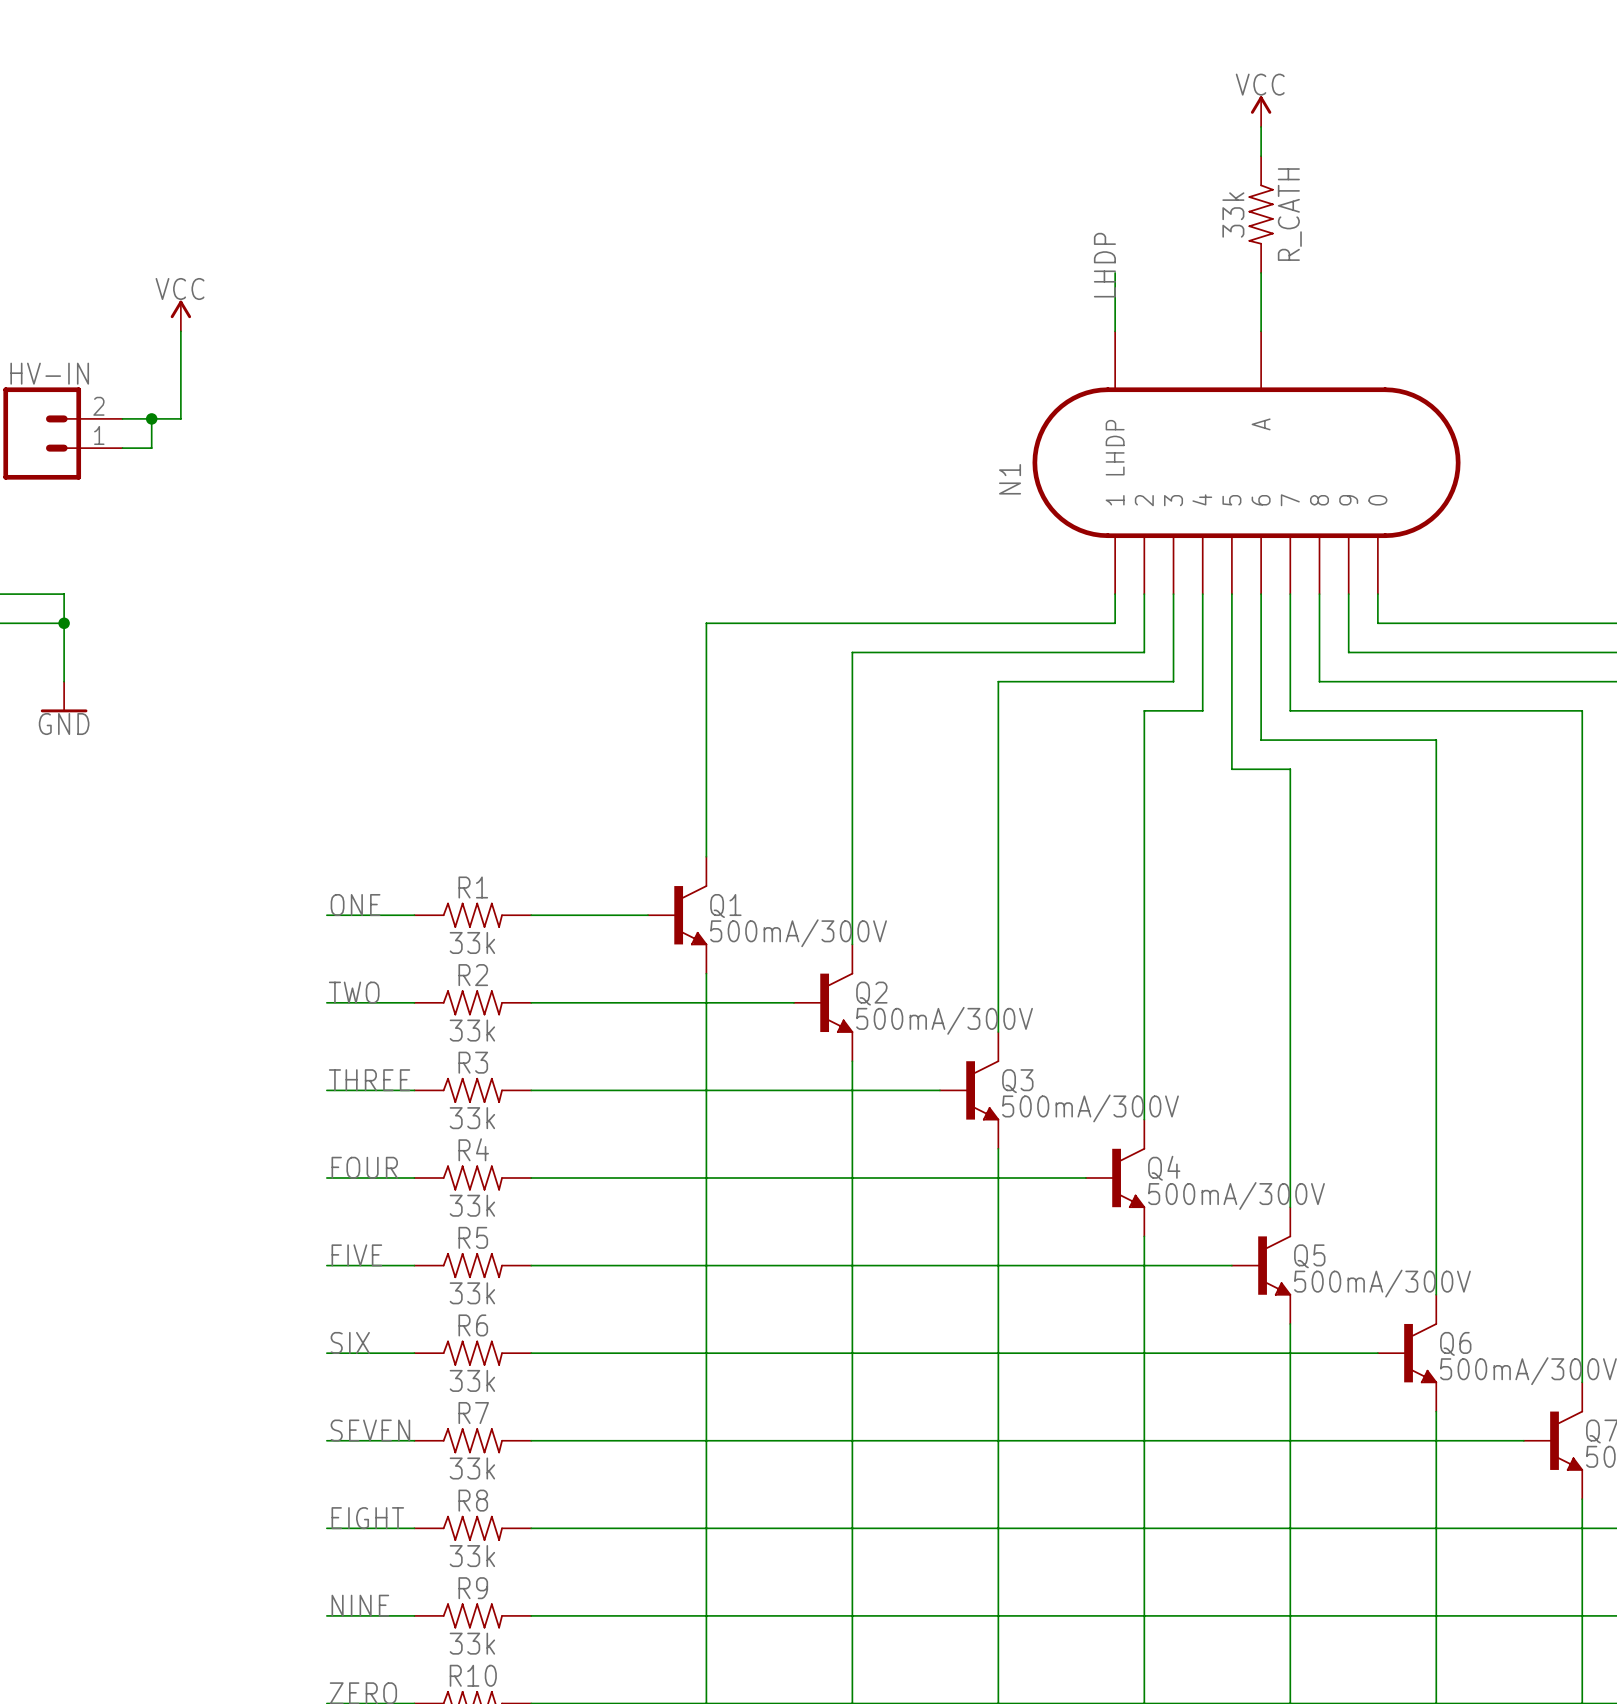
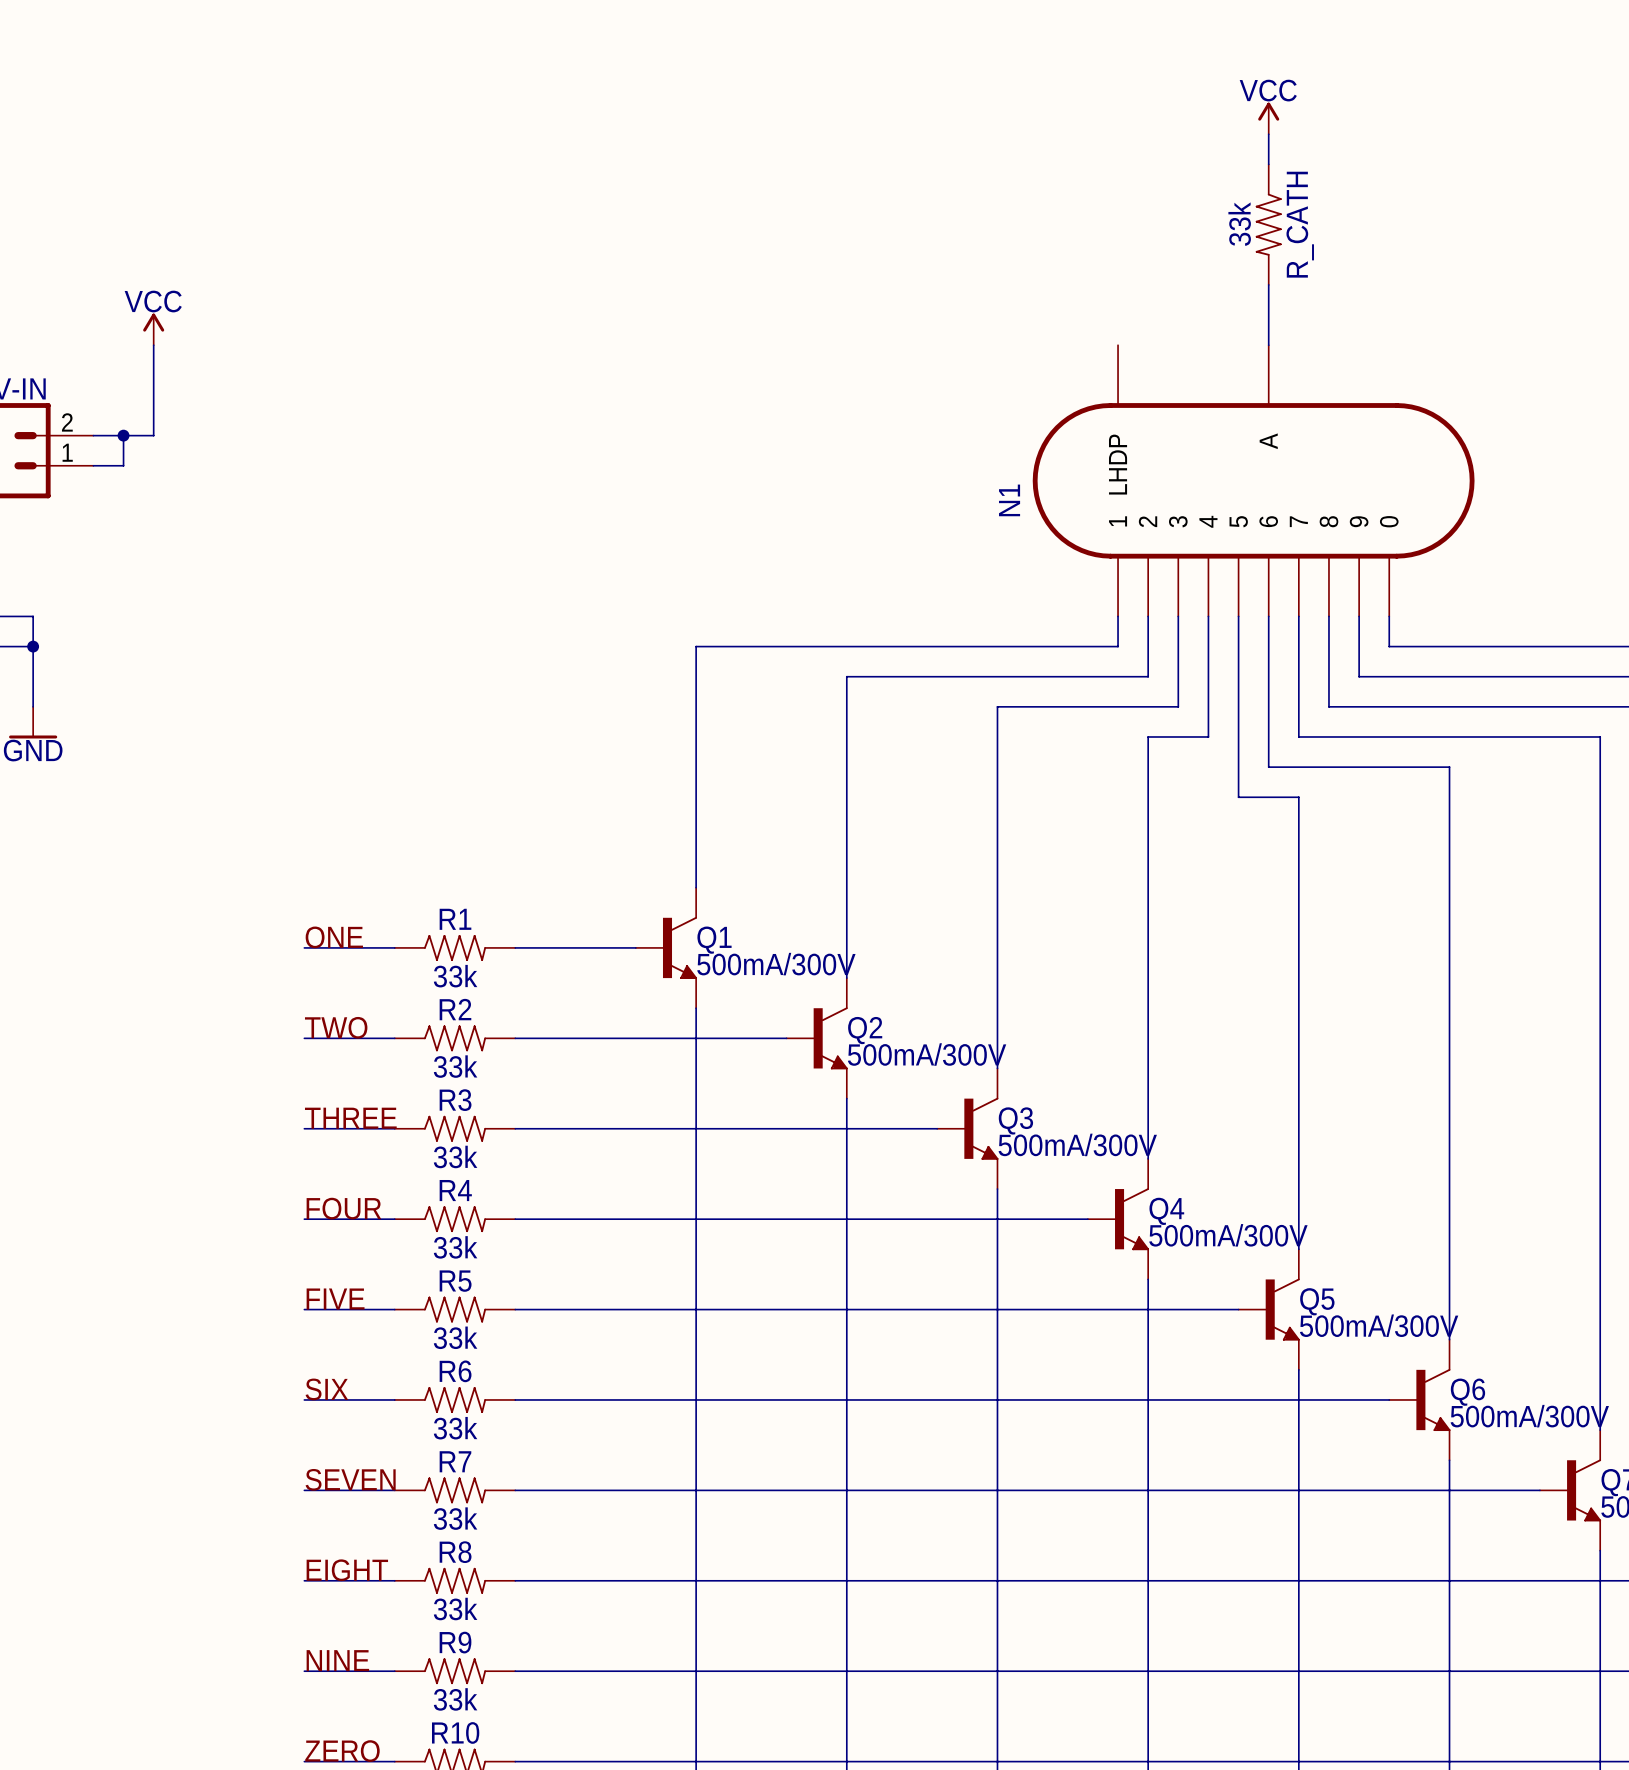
label: LHDP (1104, 265) -> none
wire: (1115, 272) (1115, 331) -> none

